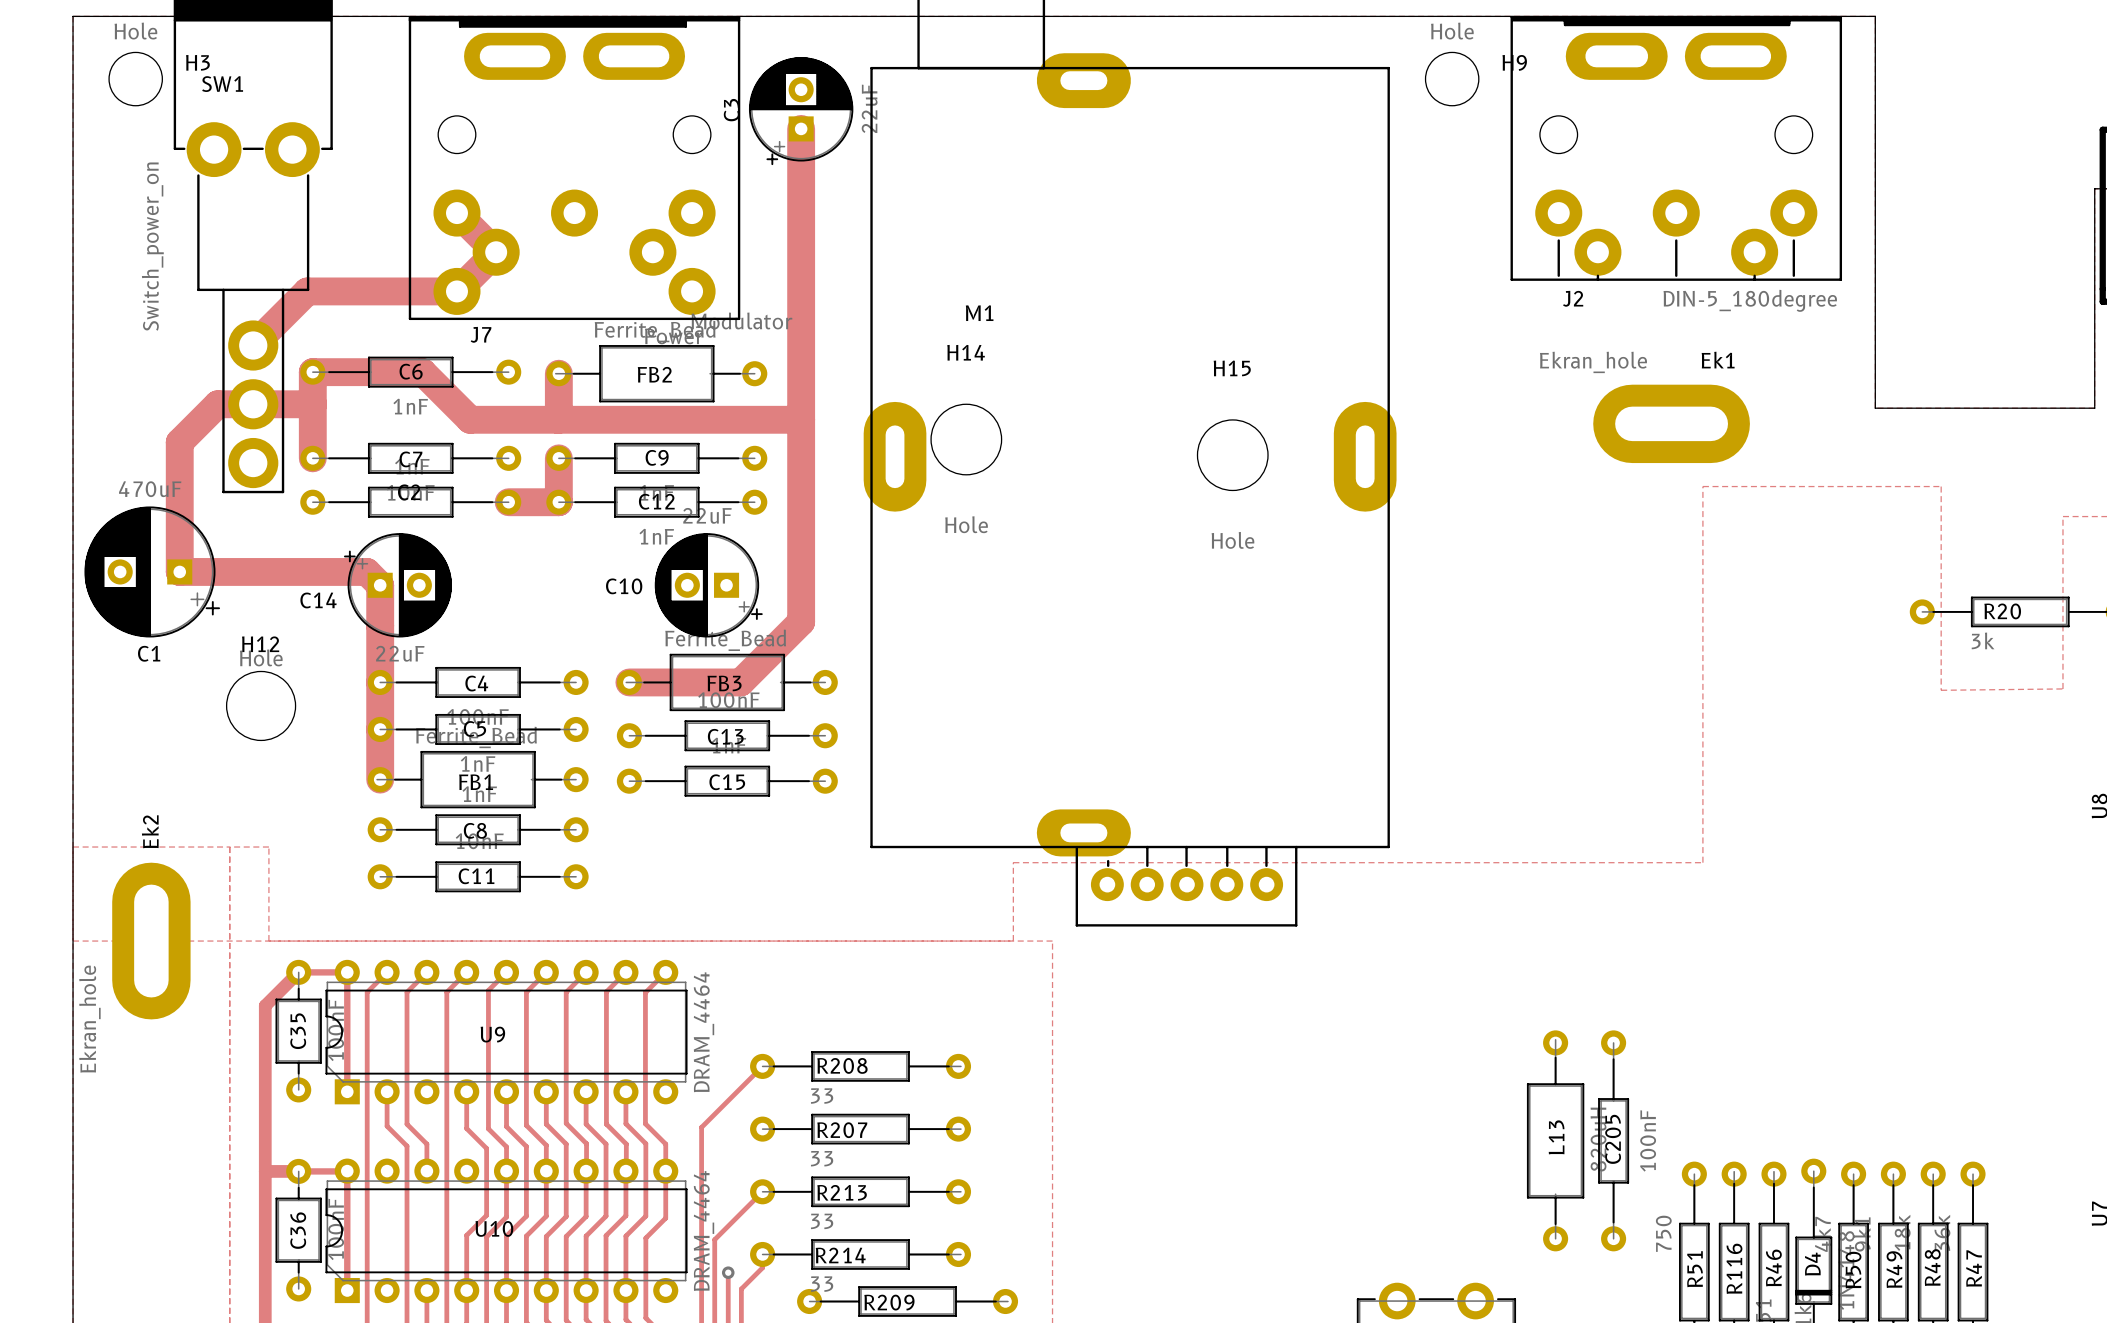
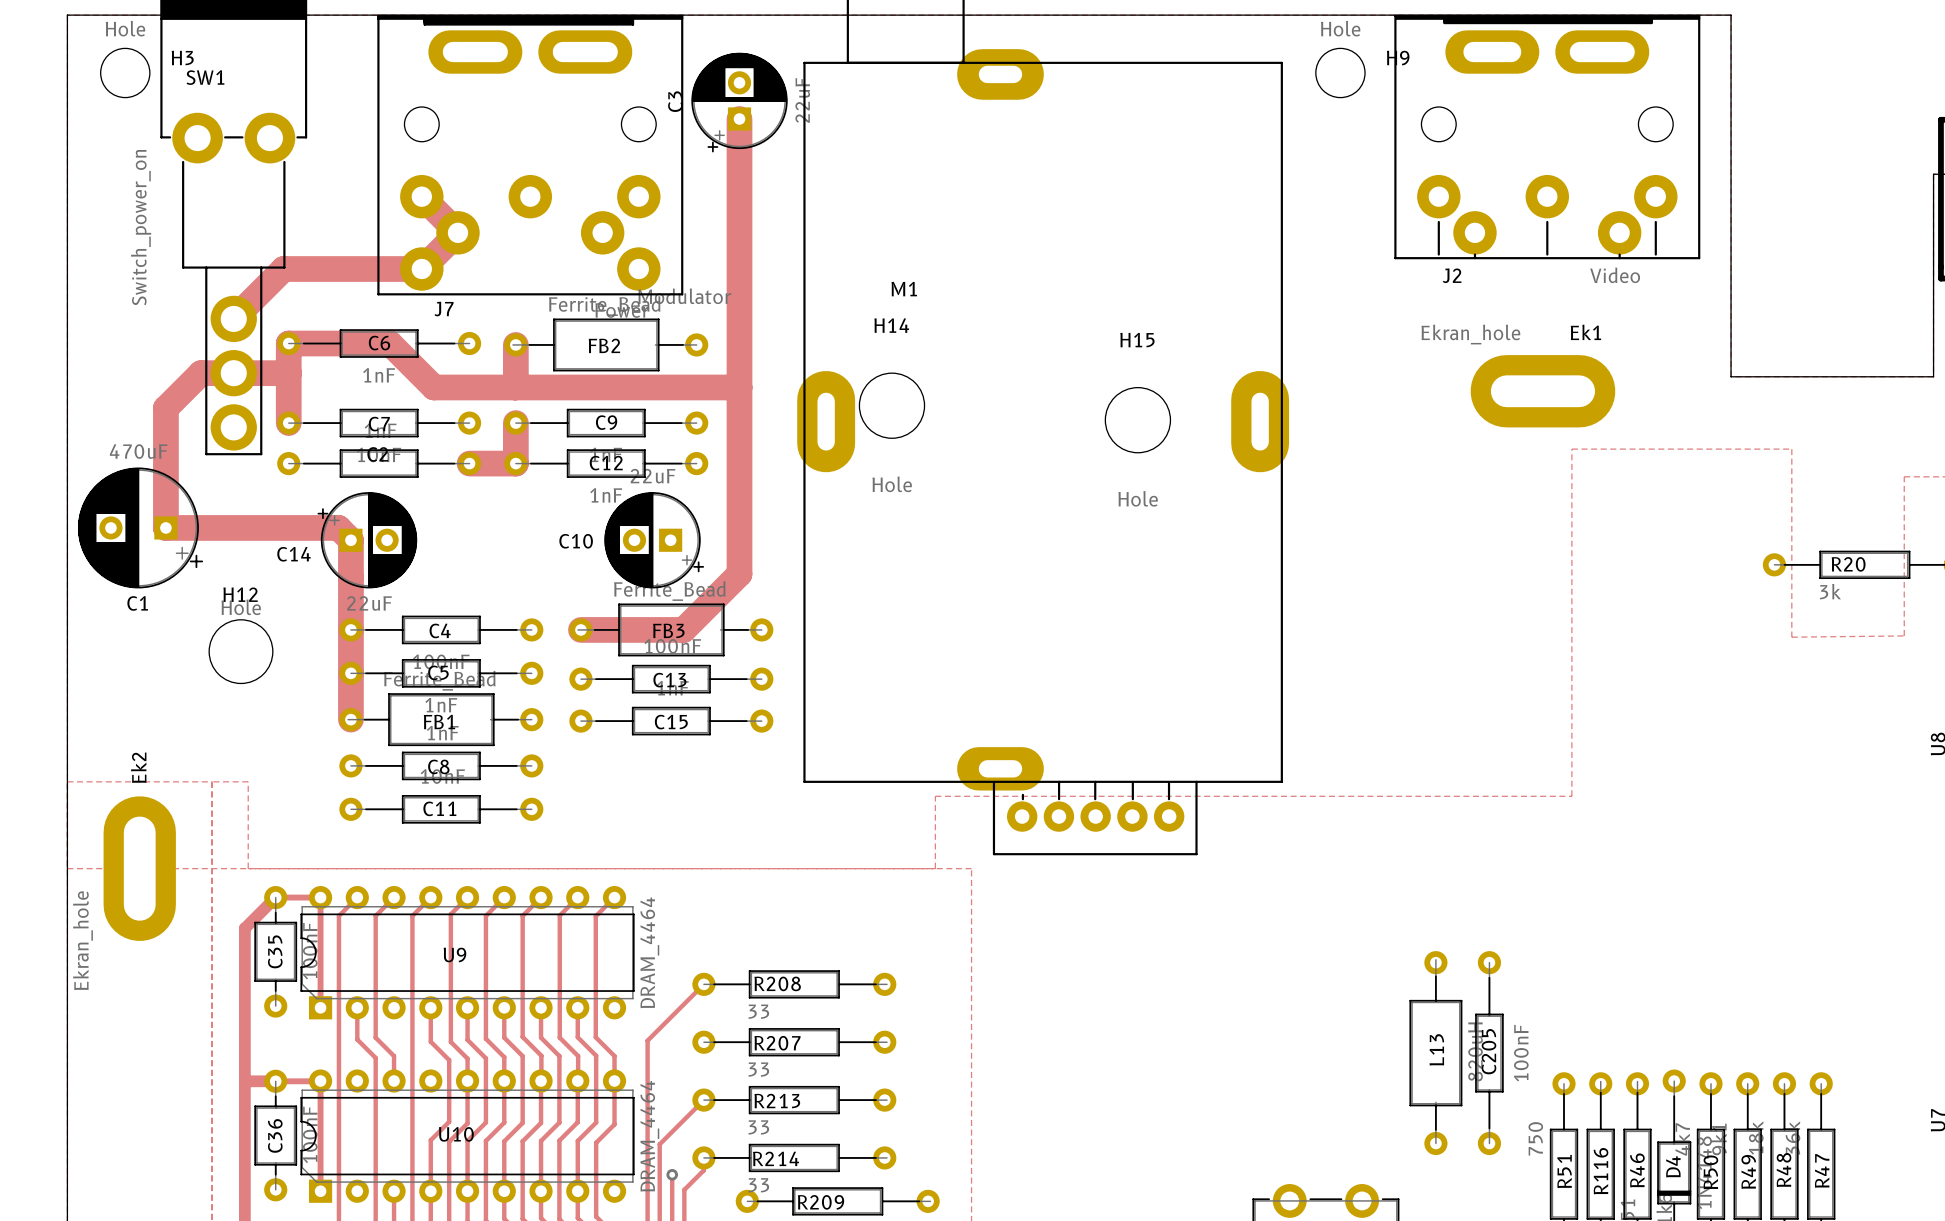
J2 value: DIN-5_180degree (1750, 300) -> Video (1615, 275)

